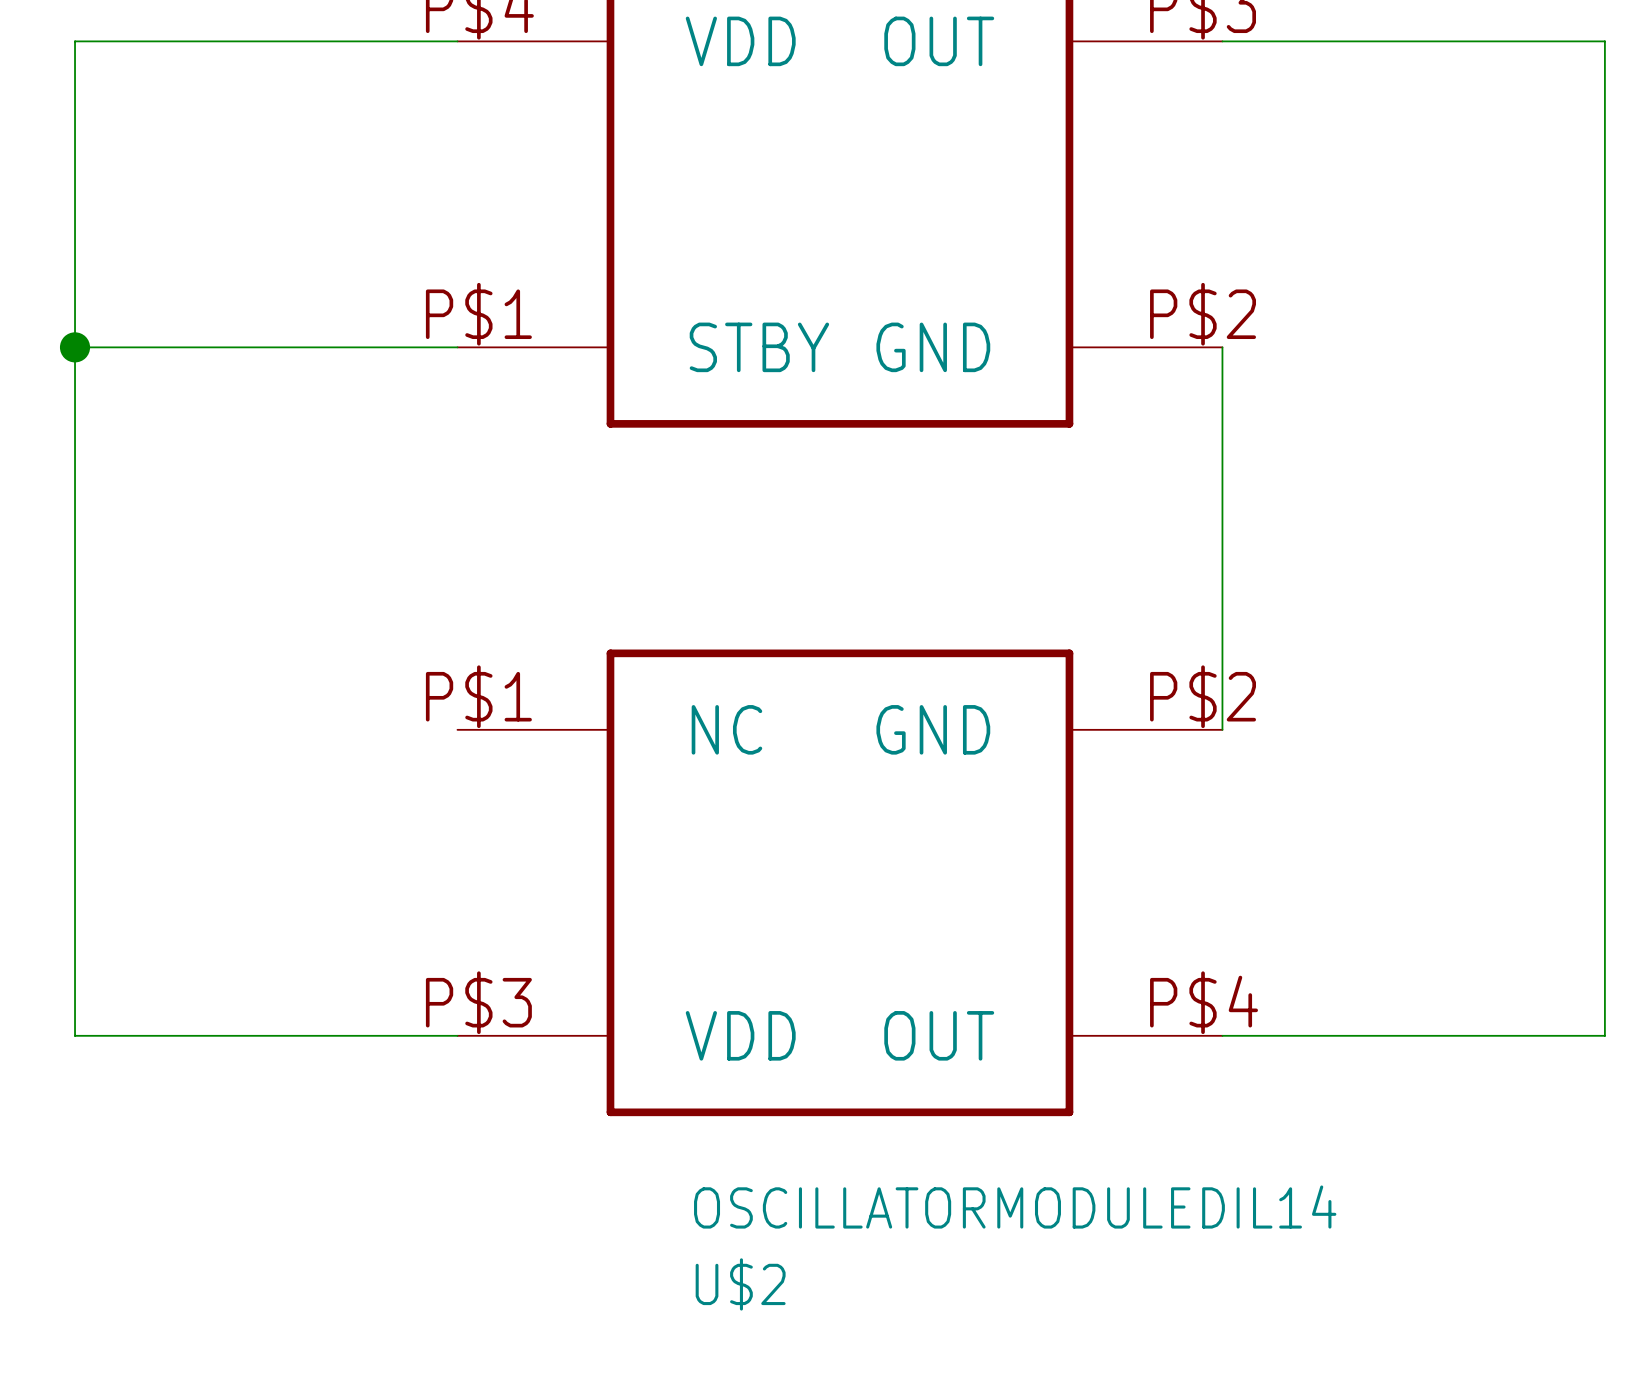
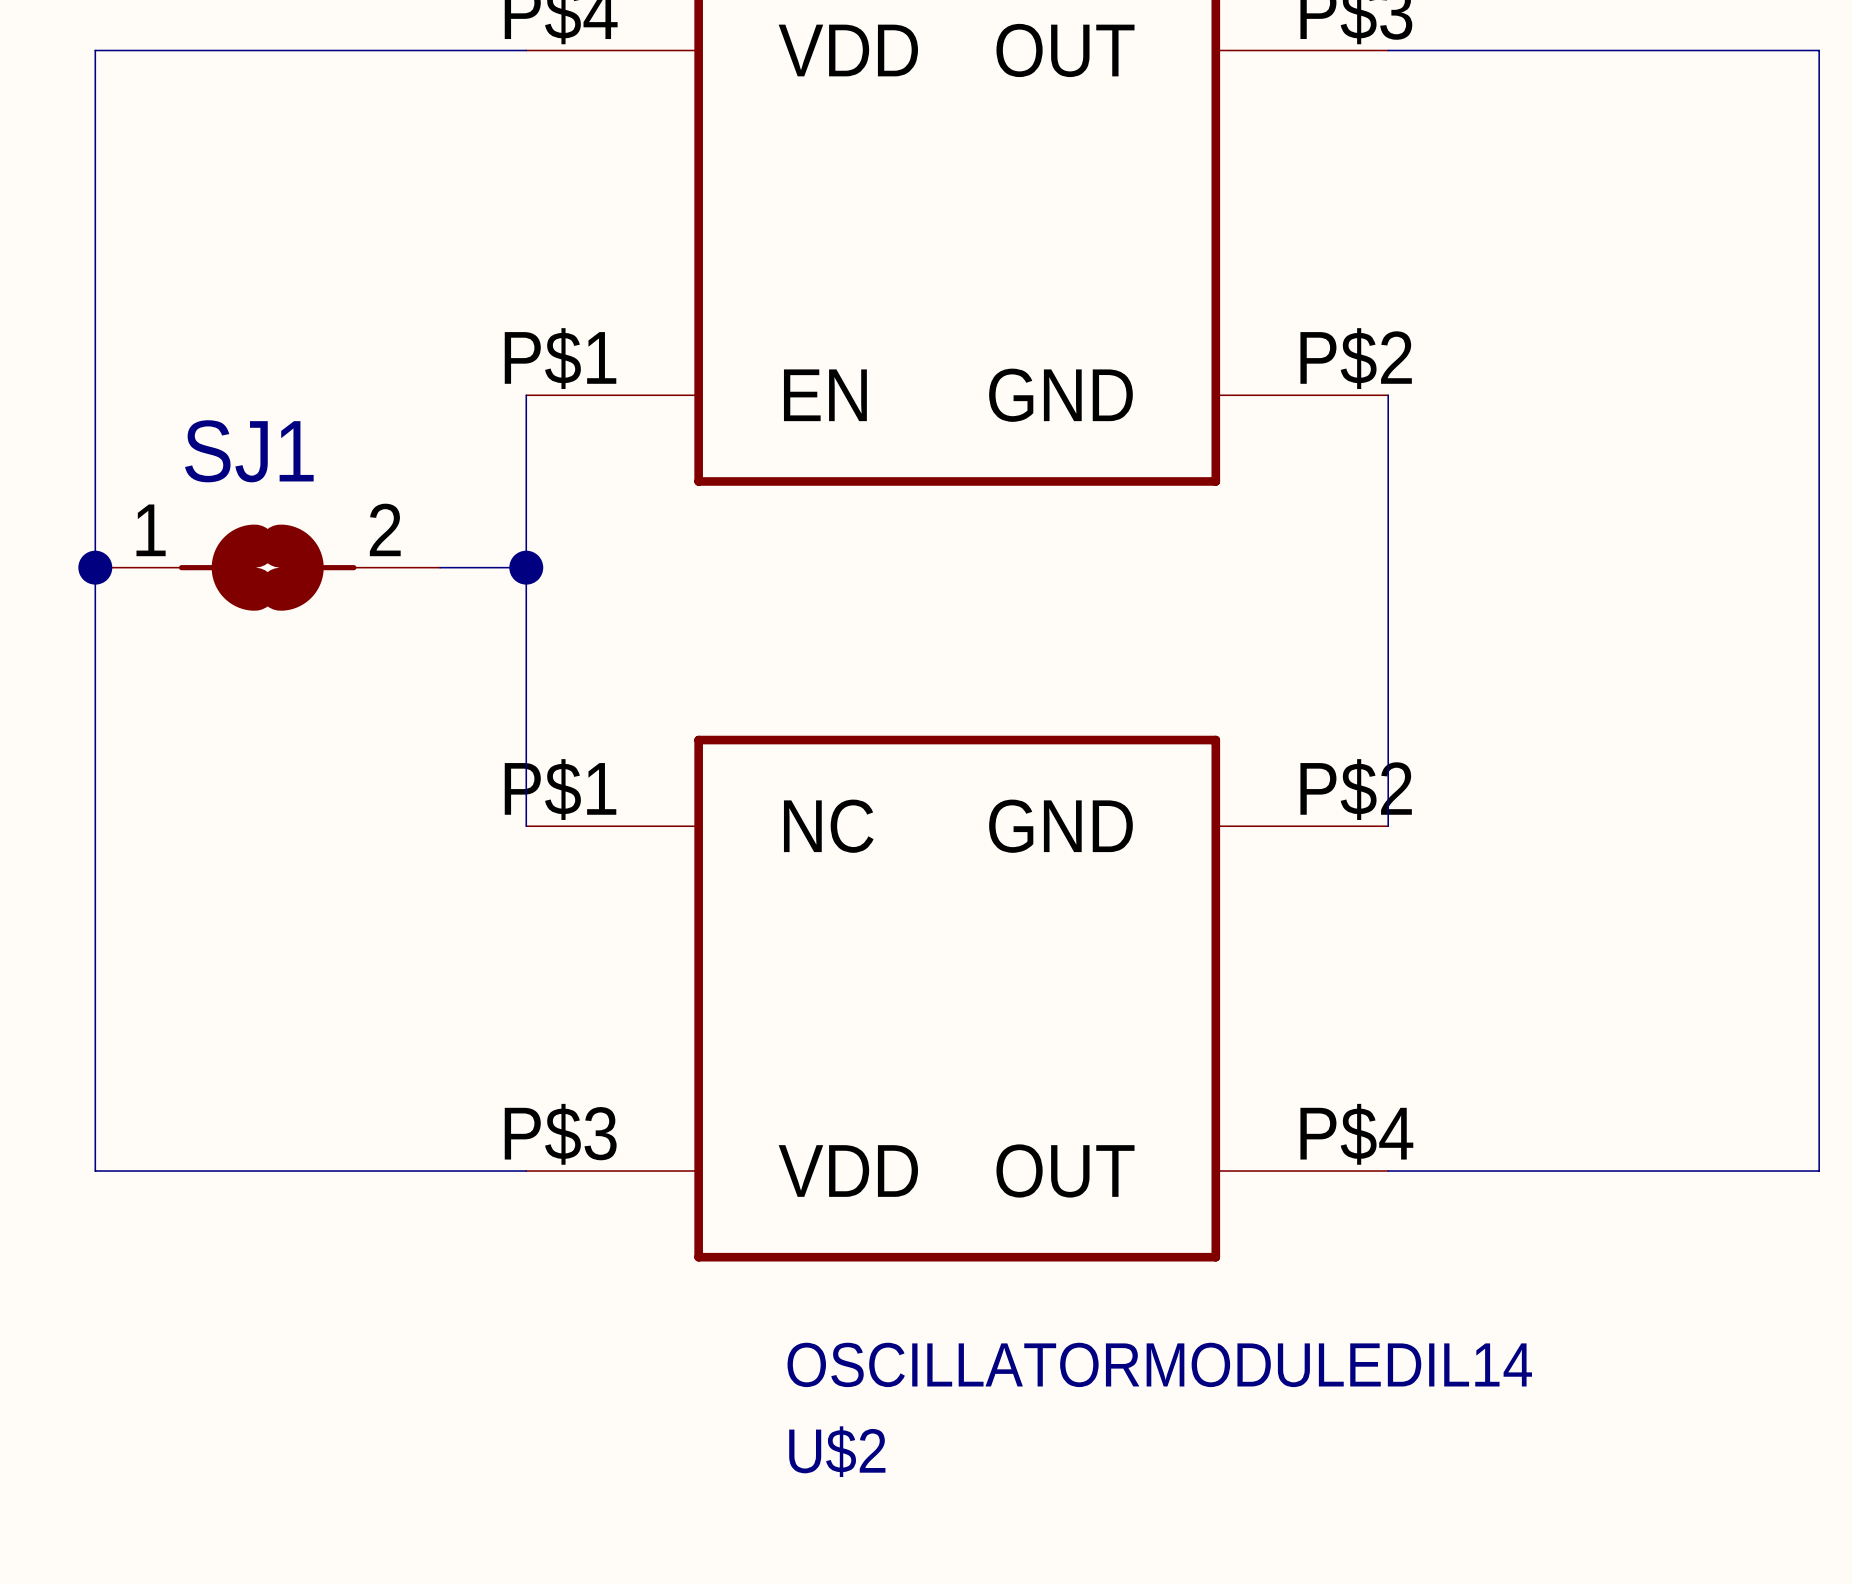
wire: (75, 347) (457, 347) -> (526, 826) (526, 395)
junction position: (75, 347) -> (95, 567)
part pin name: STBY (759, 347) -> EN (825, 395)
SJ1: none -> (267, 567)
wire: none -> (440, 567) (526, 567)
junction: none -> (526, 567)

